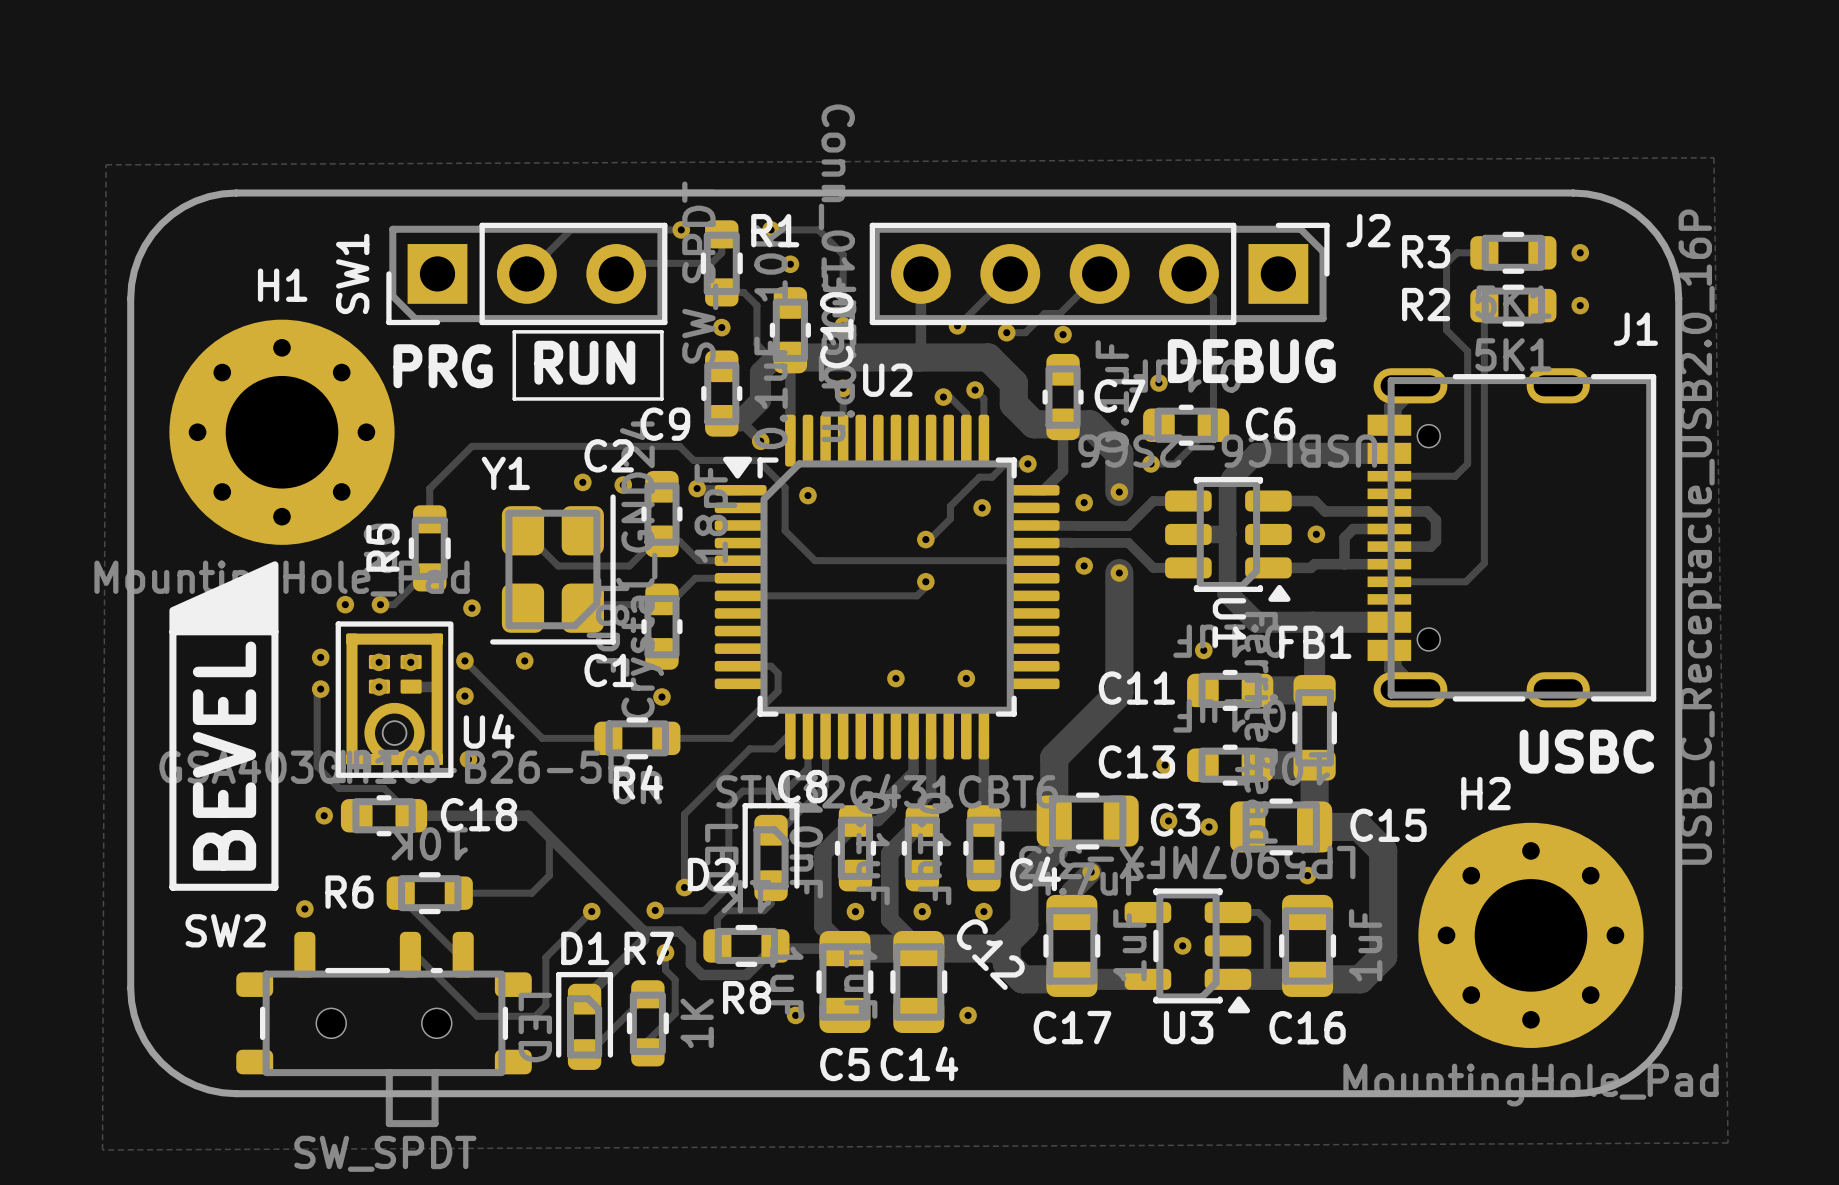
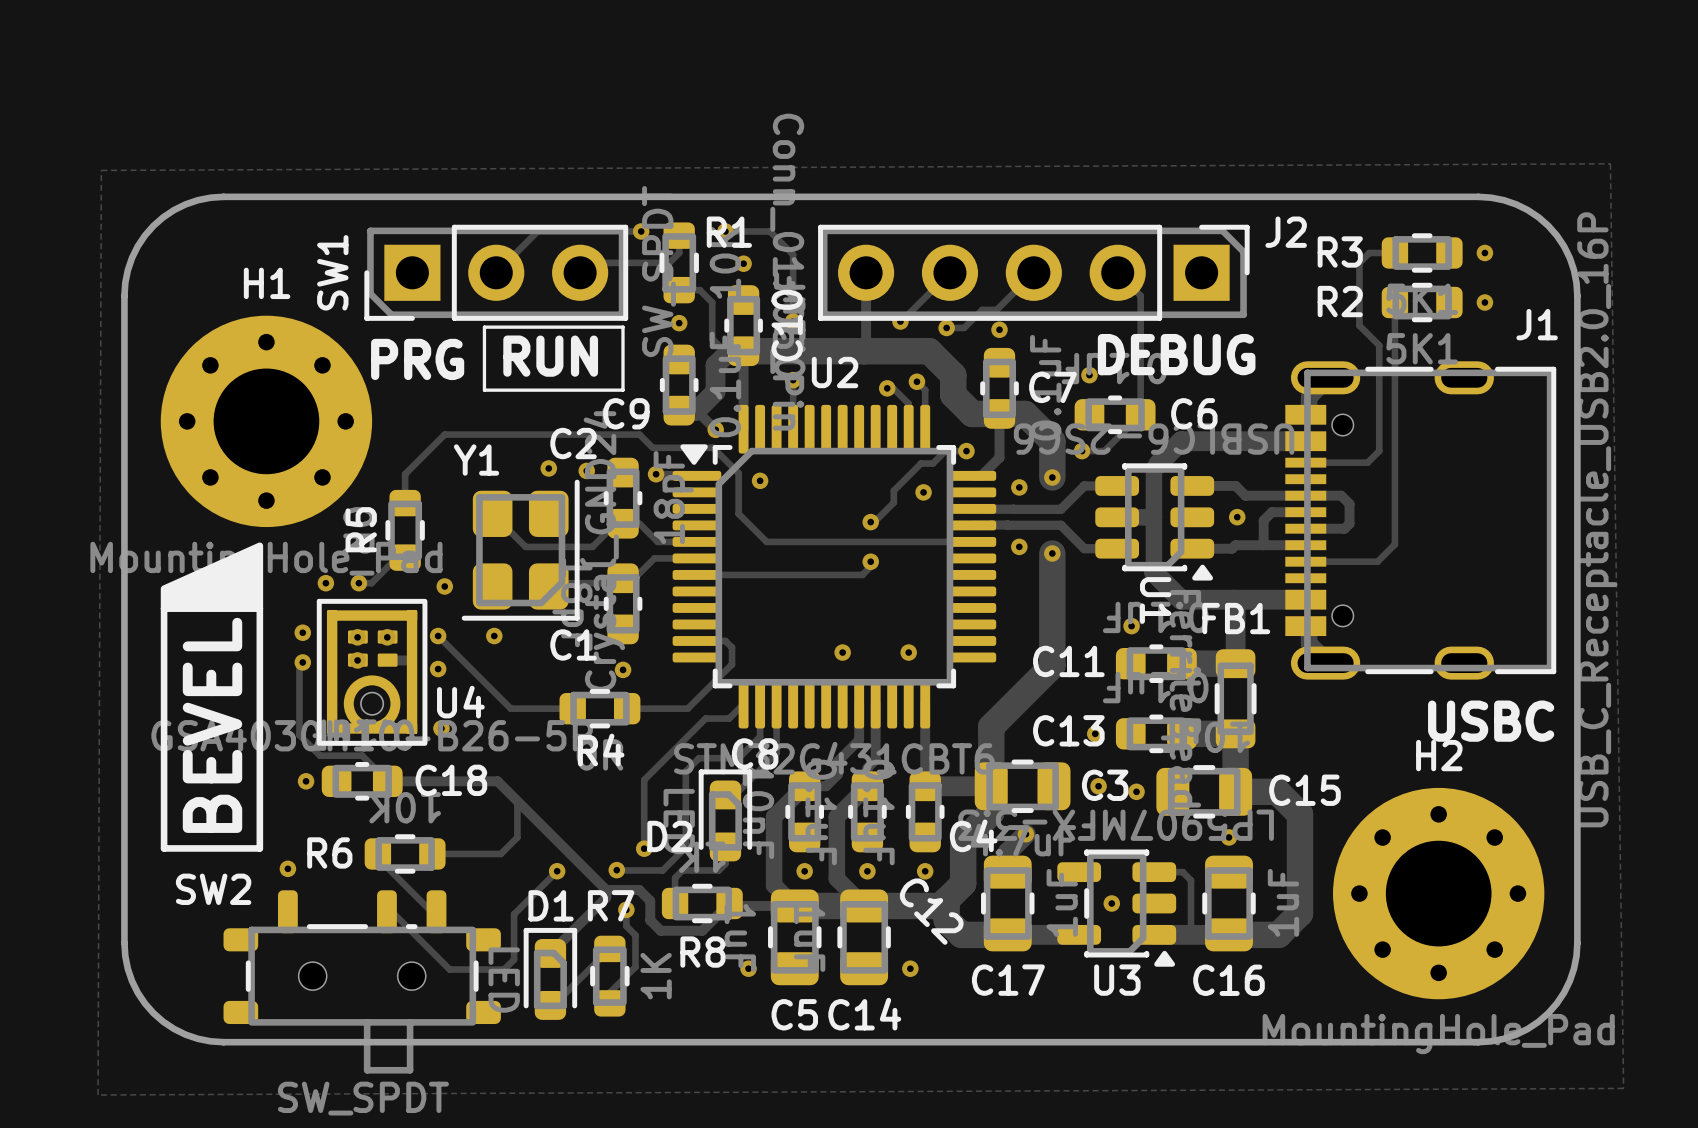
H2 name position: H2 (1485, 793) -> H2 (1439, 755)

